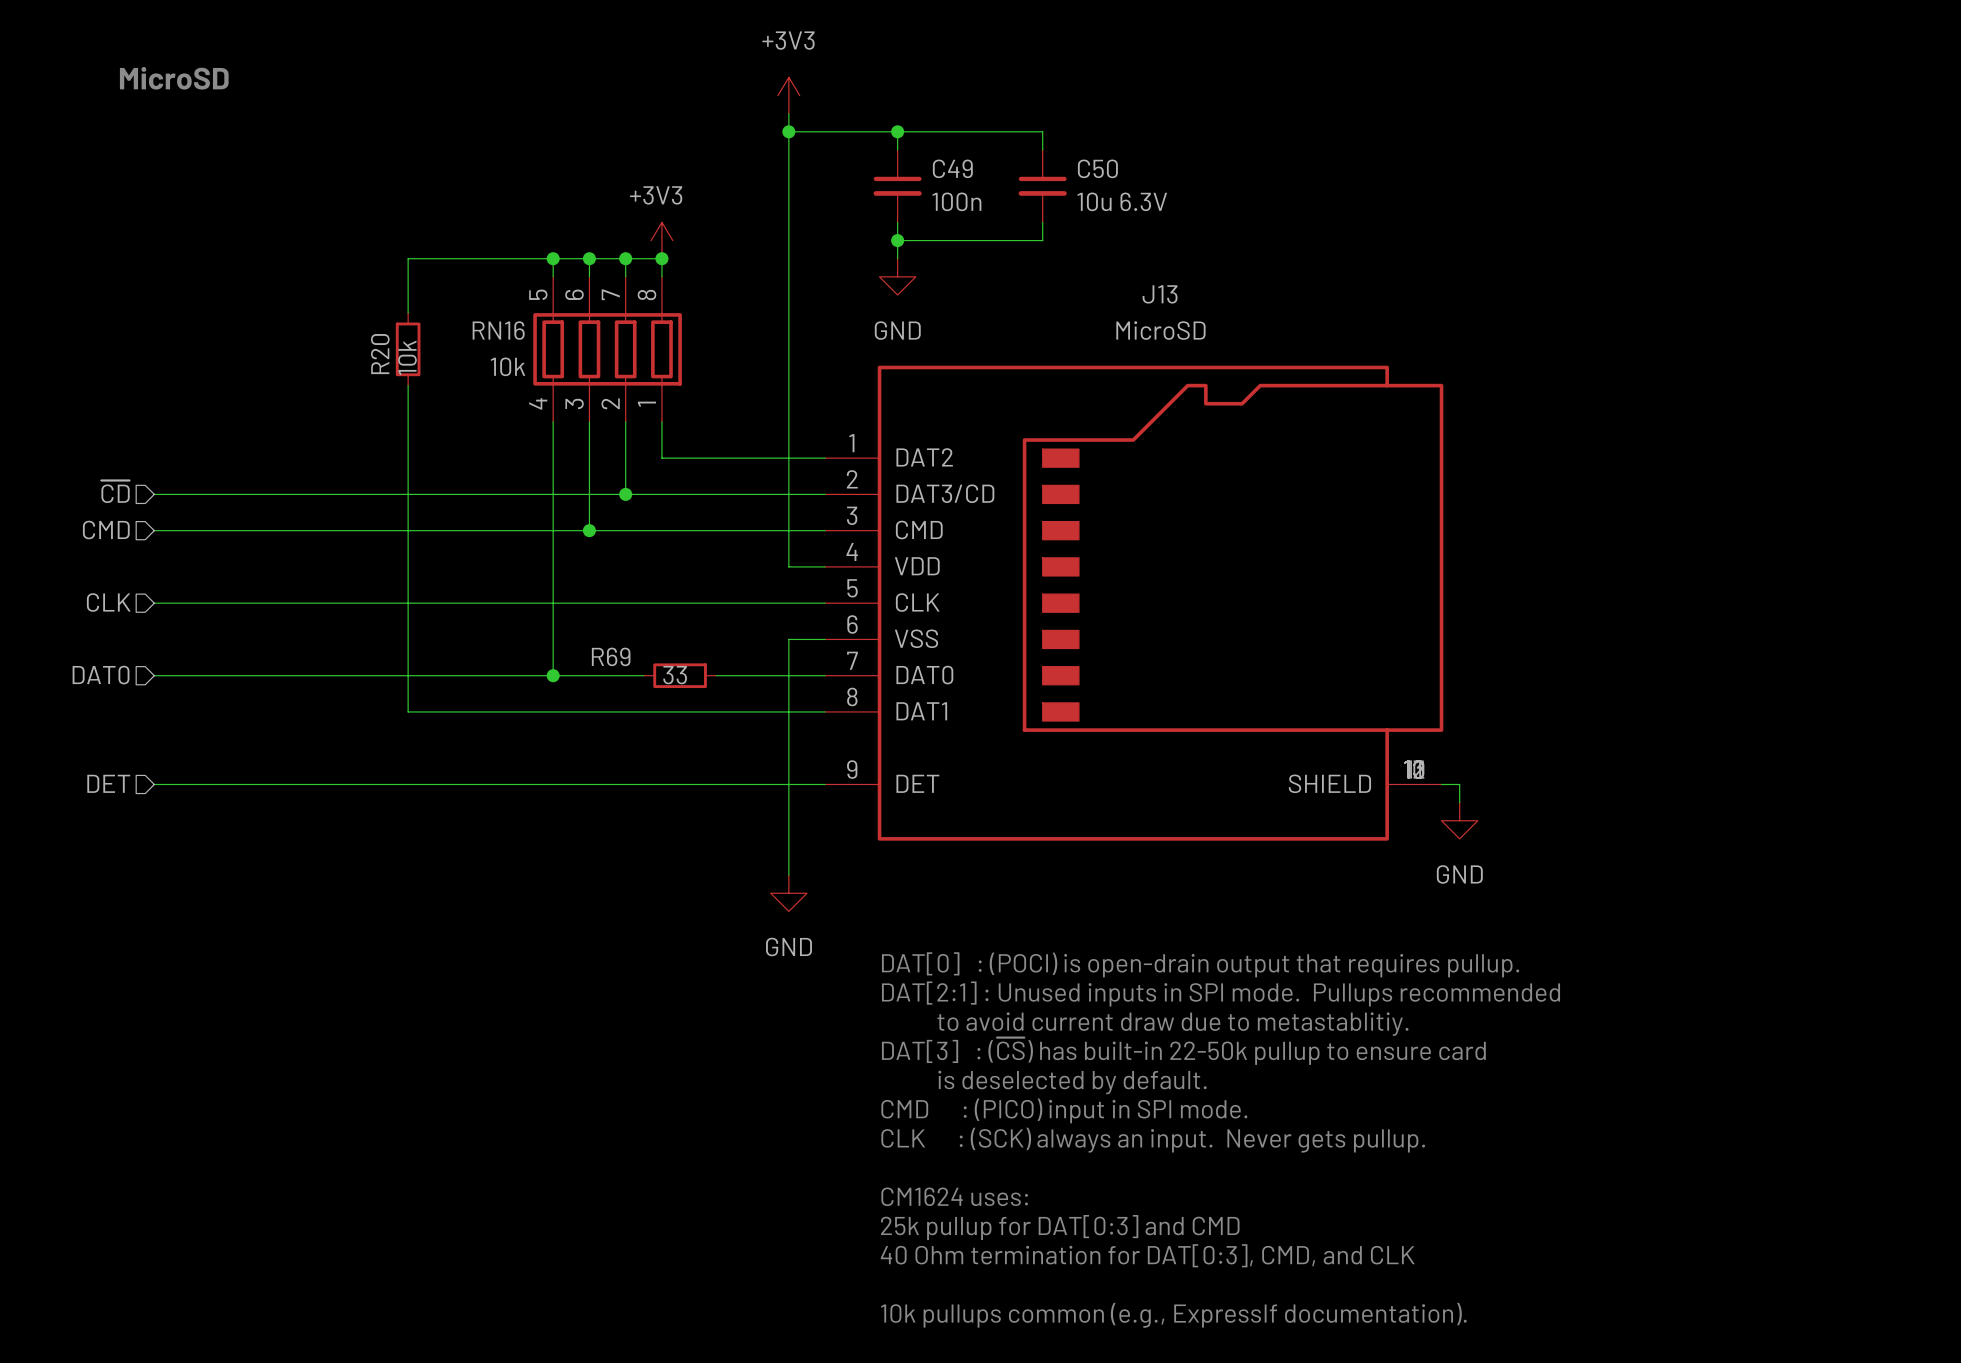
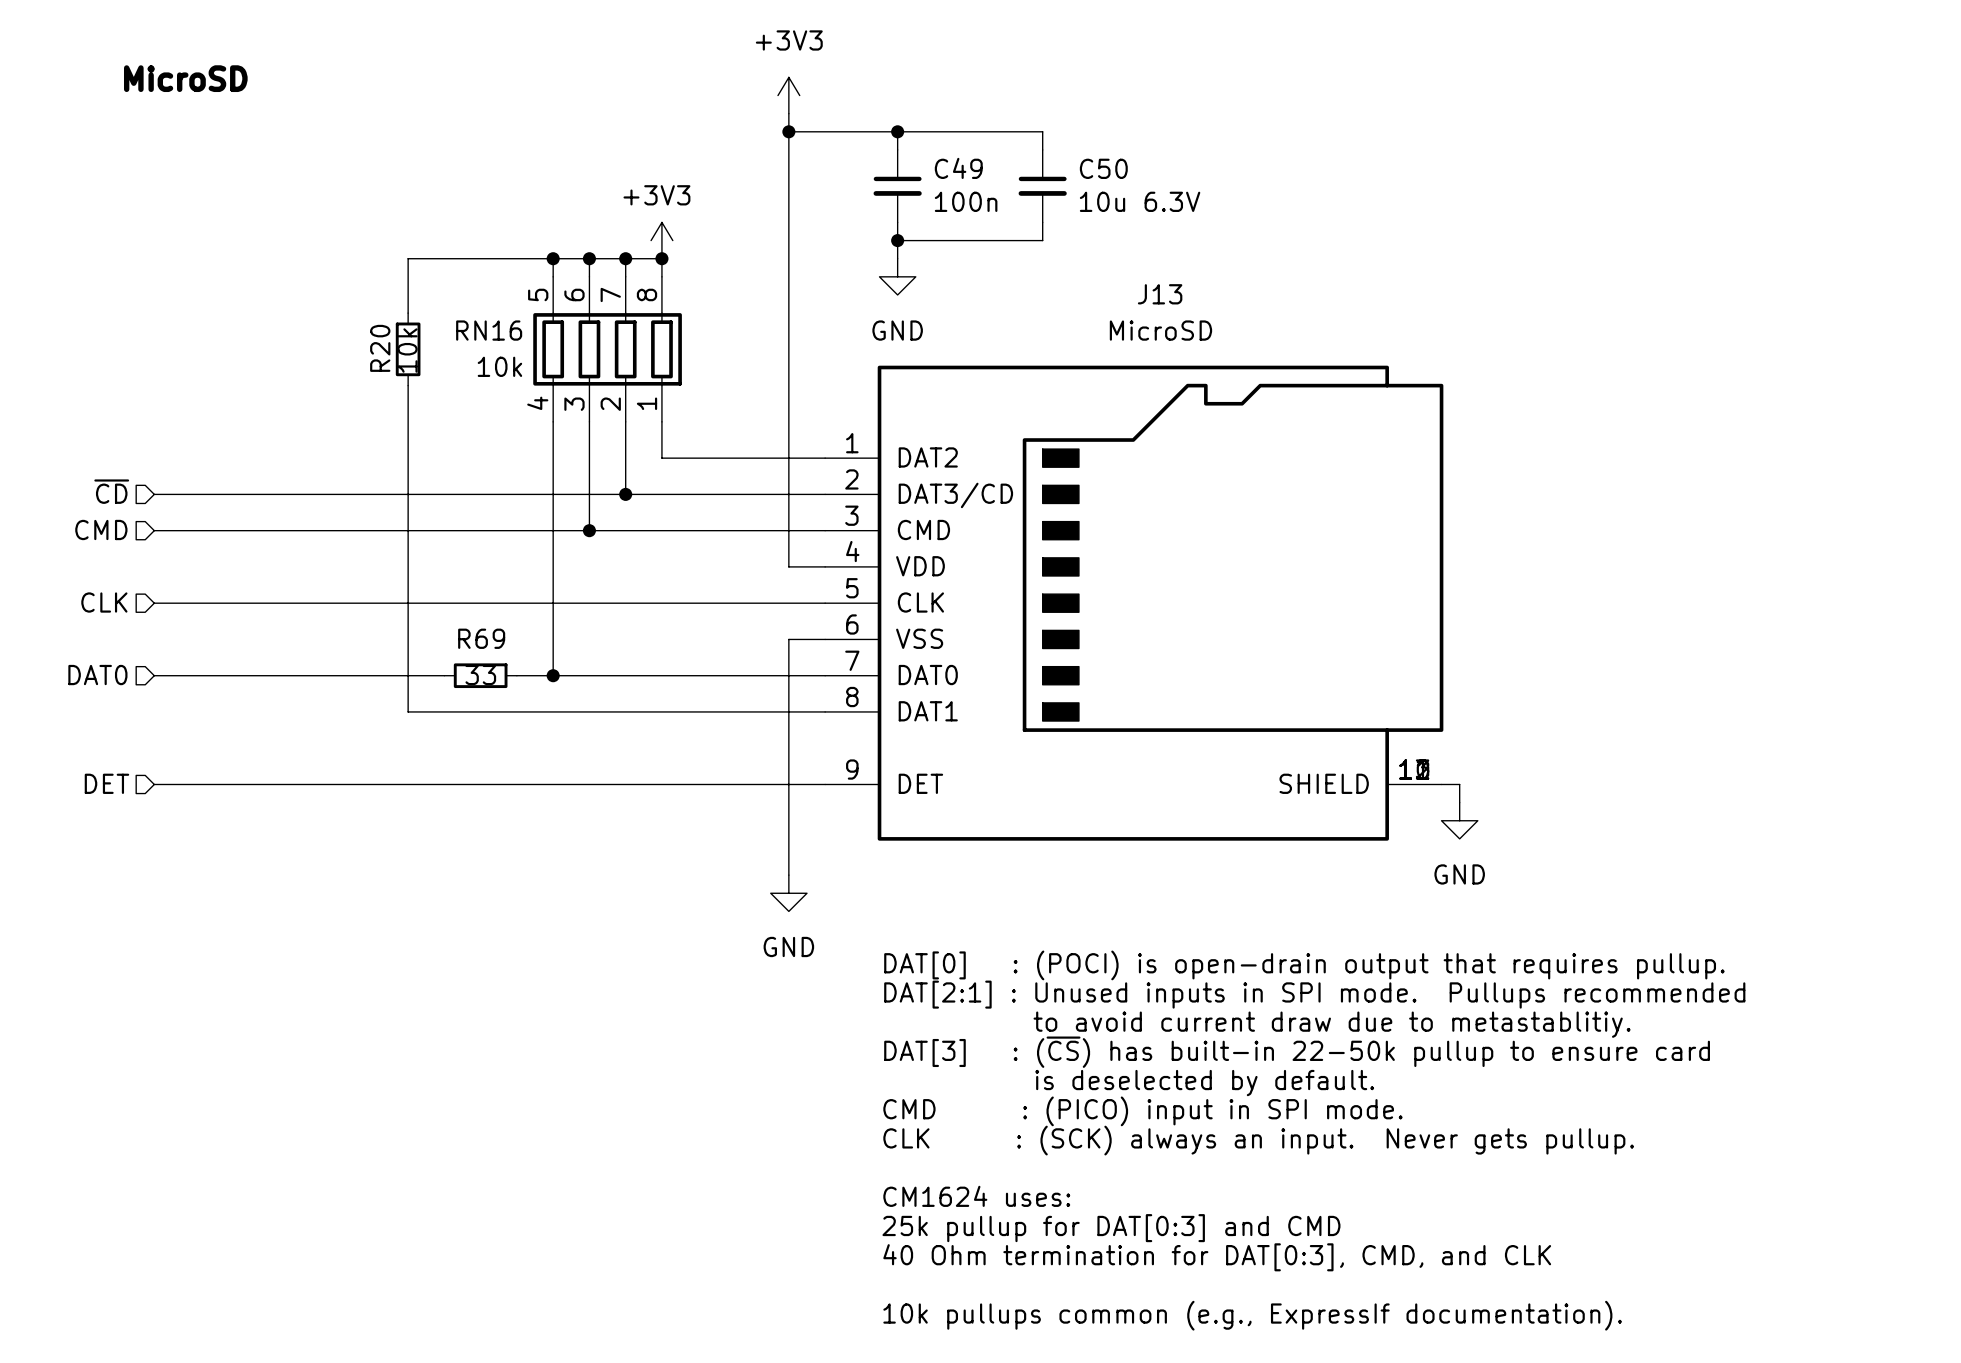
R69 name position: R69 (611, 656) -> R69 (481, 638)
wire: (444, 675) (516, 675) -> (643, 675) (716, 675)
R69 position: (680, 675) -> (480, 675)

